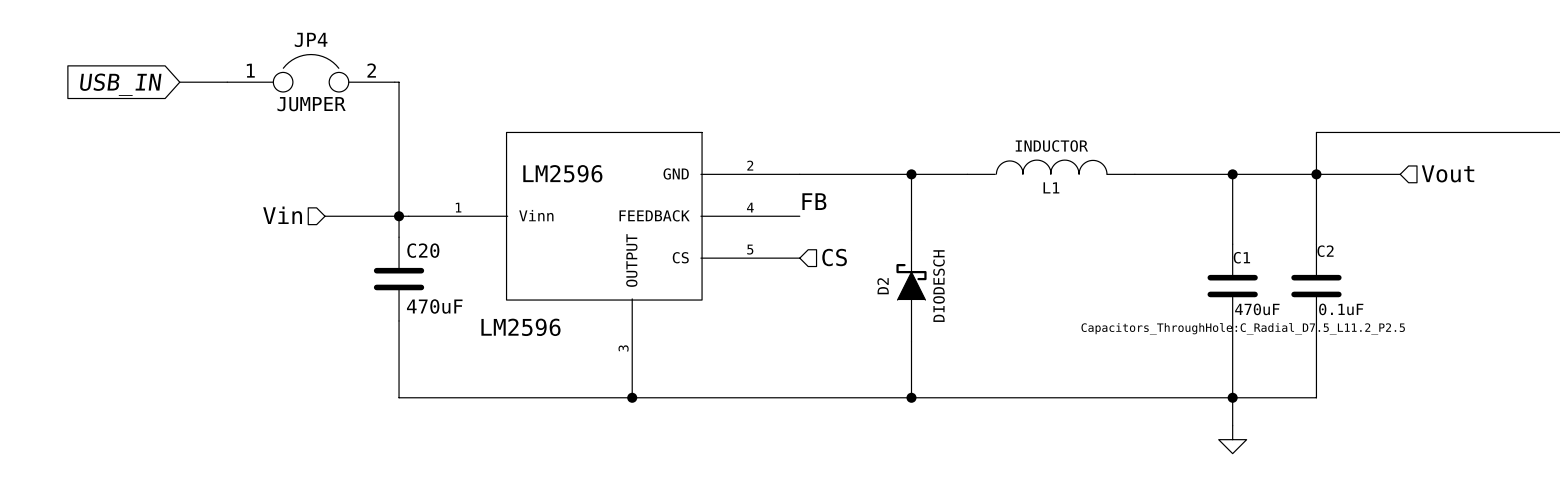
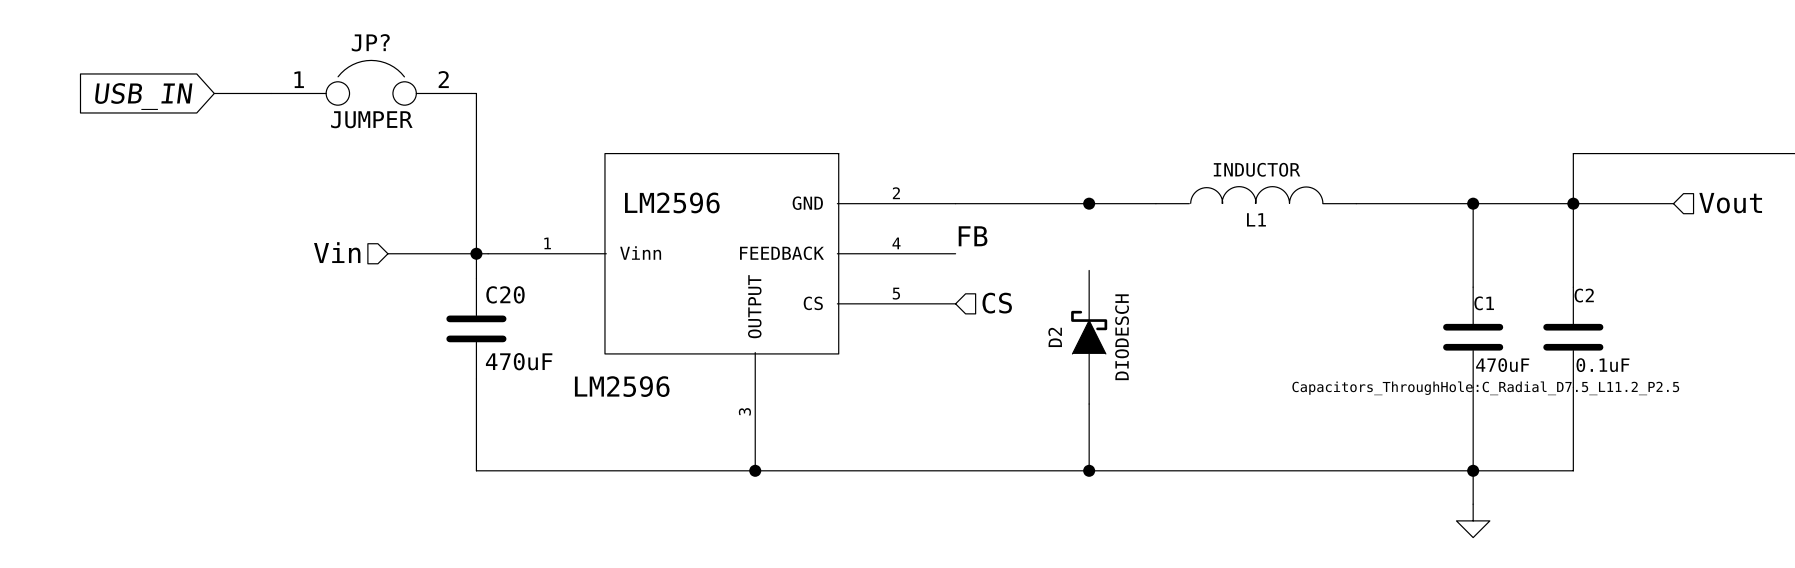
JP4 name: JP4 (311, 39) -> JP? (370, 42)
wire: (911, 172) (911, 230) -> none

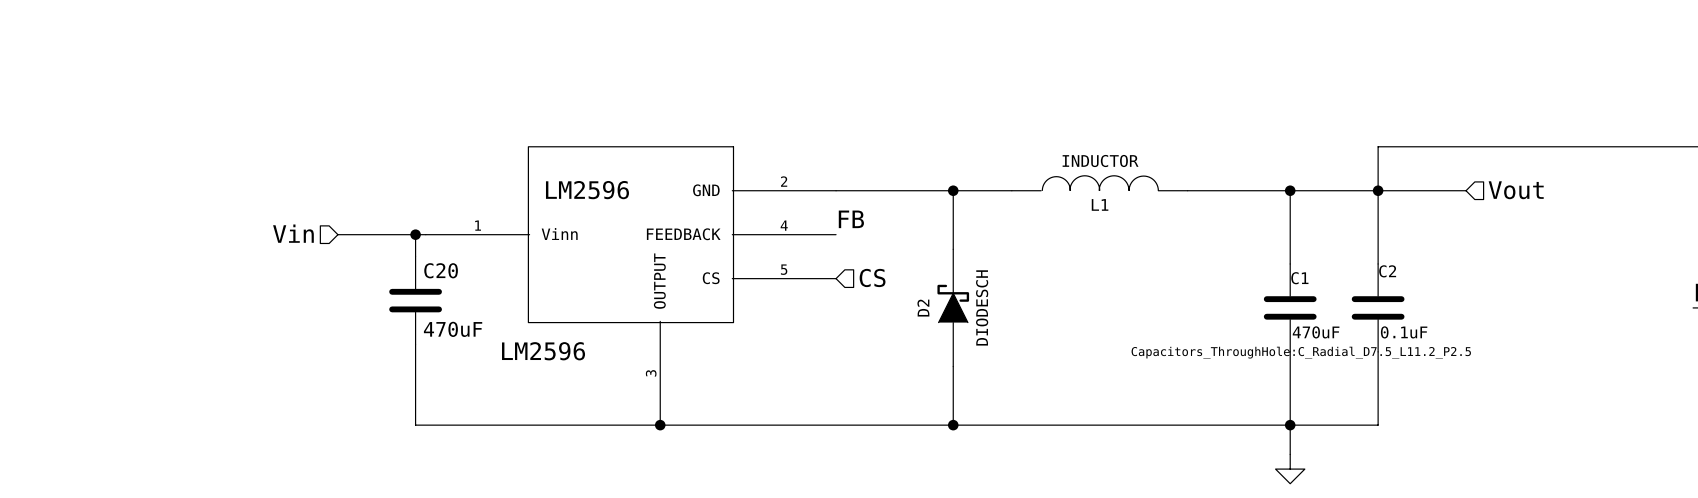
JP?: JUMPER (371, 82) -> none
wire: (214, 93) (271, 93) -> none
wire: (471, 93) (476, 93) (476, 253) -> none
global label: USB_IN (143, 96) -> none
wire: none -> (953, 190) (953, 249)

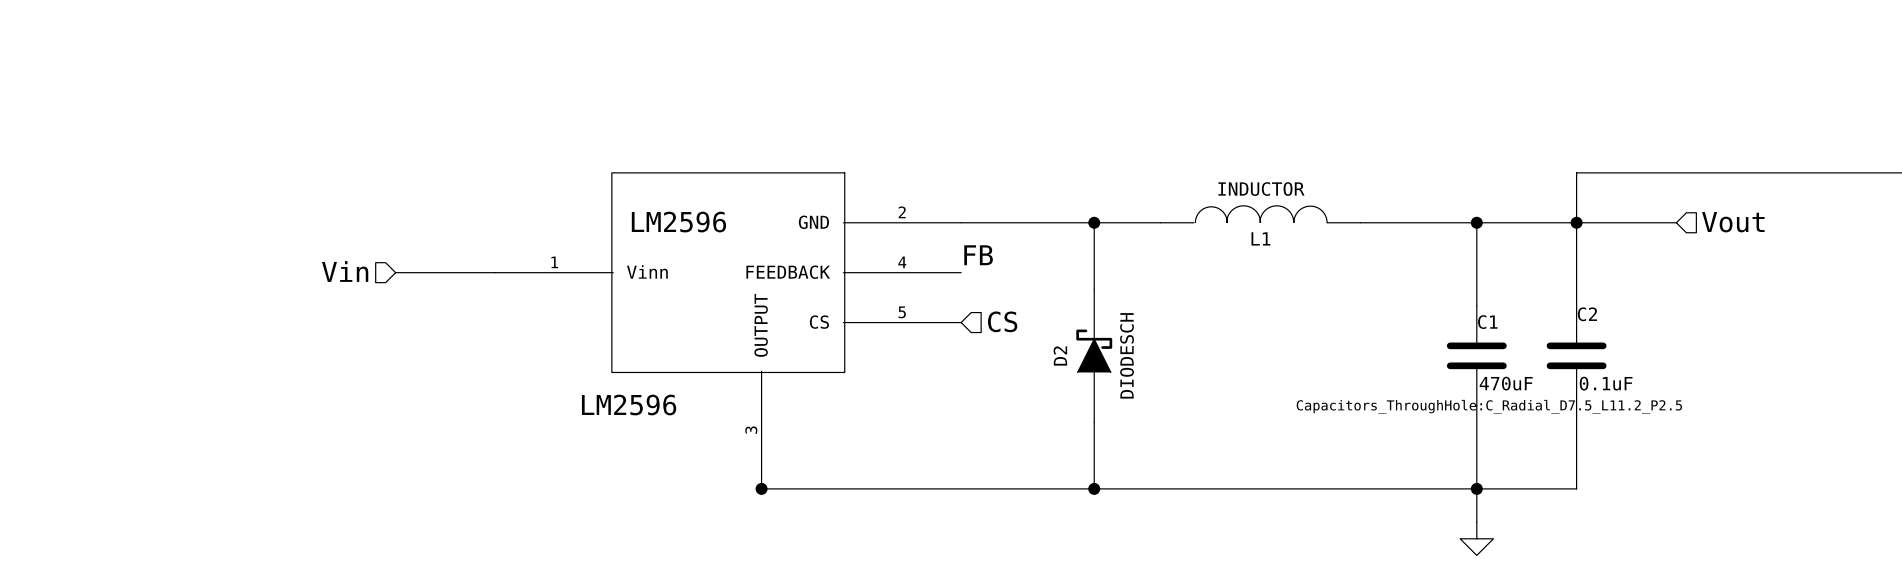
wire: (415, 234) (415, 256) -> none
junction: (415, 234) -> none
C20: 470uF (415, 300) -> none
wire: (415, 344) (415, 425) (660, 425) -> none

